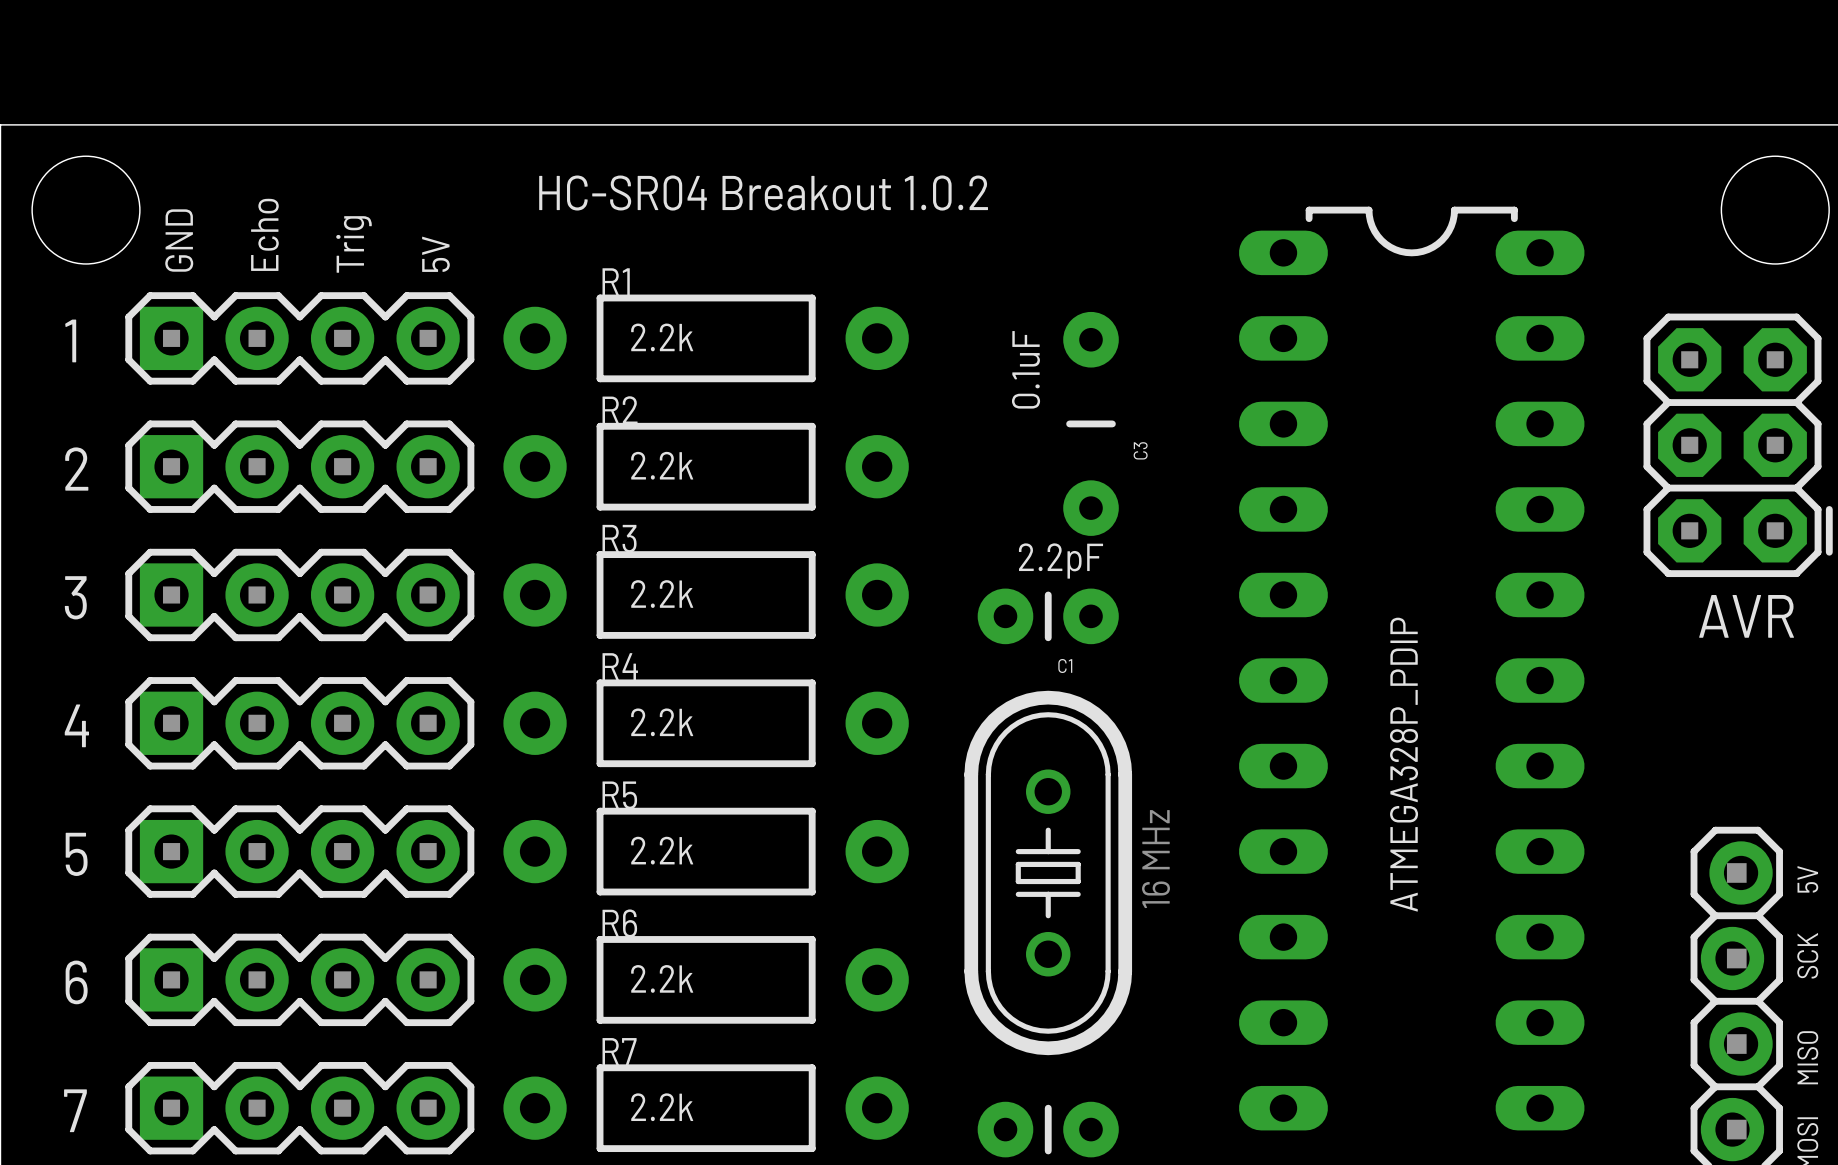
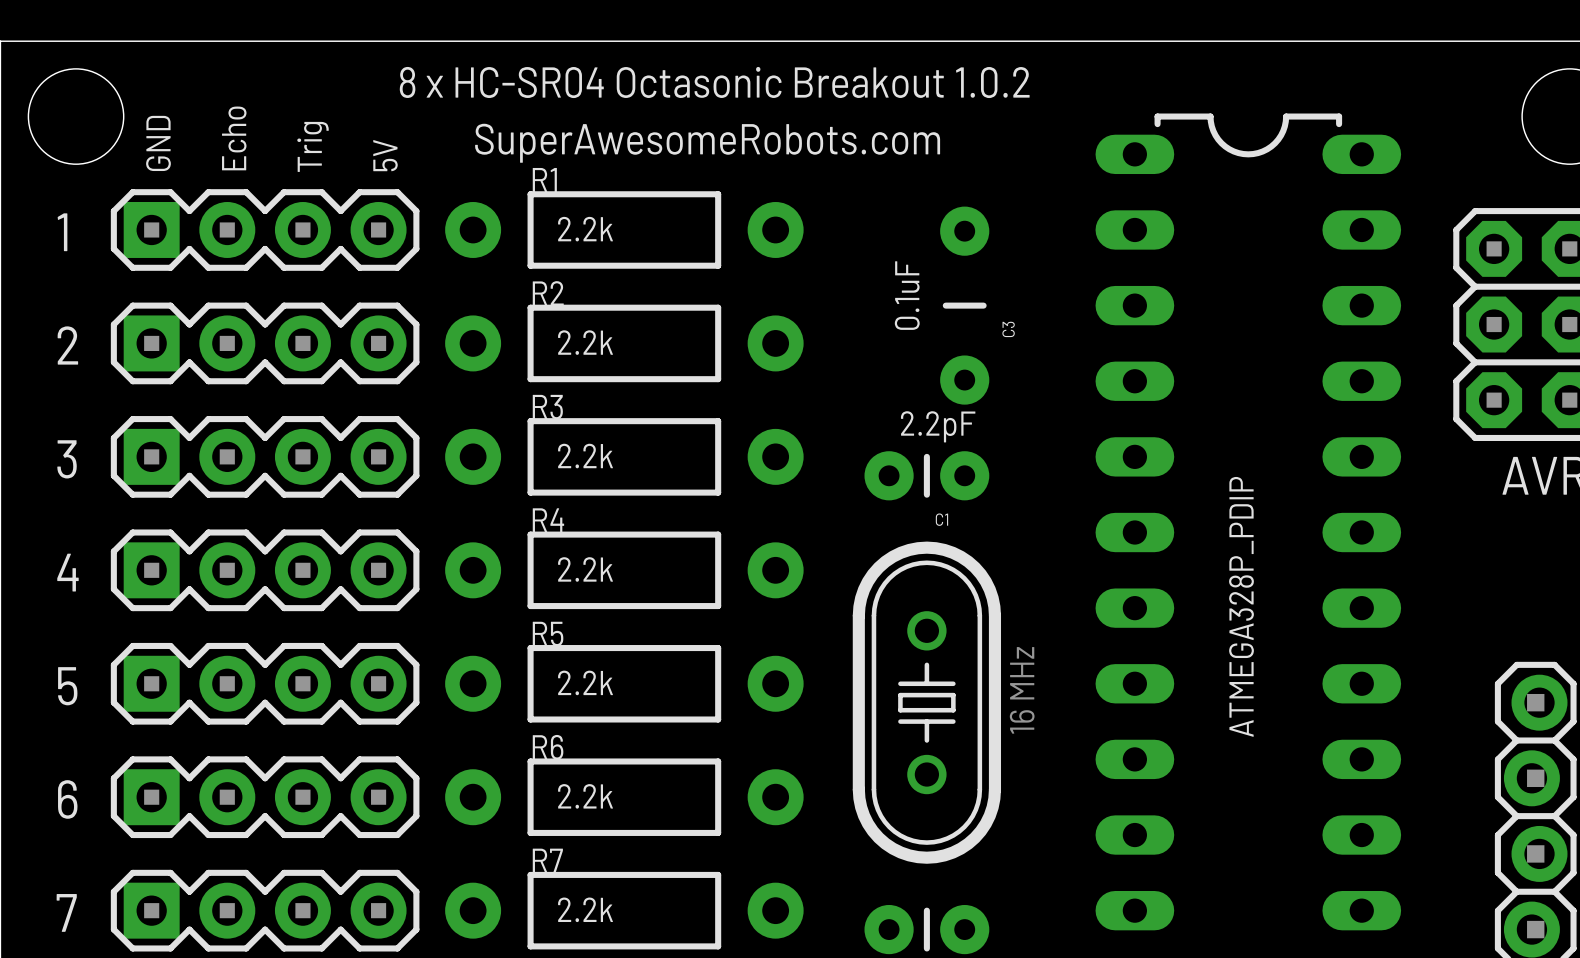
text: HC-SR04 Breakout 1.0.2 (763, 193) -> 8 x HC-SR04 Octasonic Breakout 1.0.2 (714, 82)
text: none -> SuperAwesomeRobots.com (707, 143)
C3 value position: 0.1uF (1026, 369) -> 0.1uF (907, 295)

